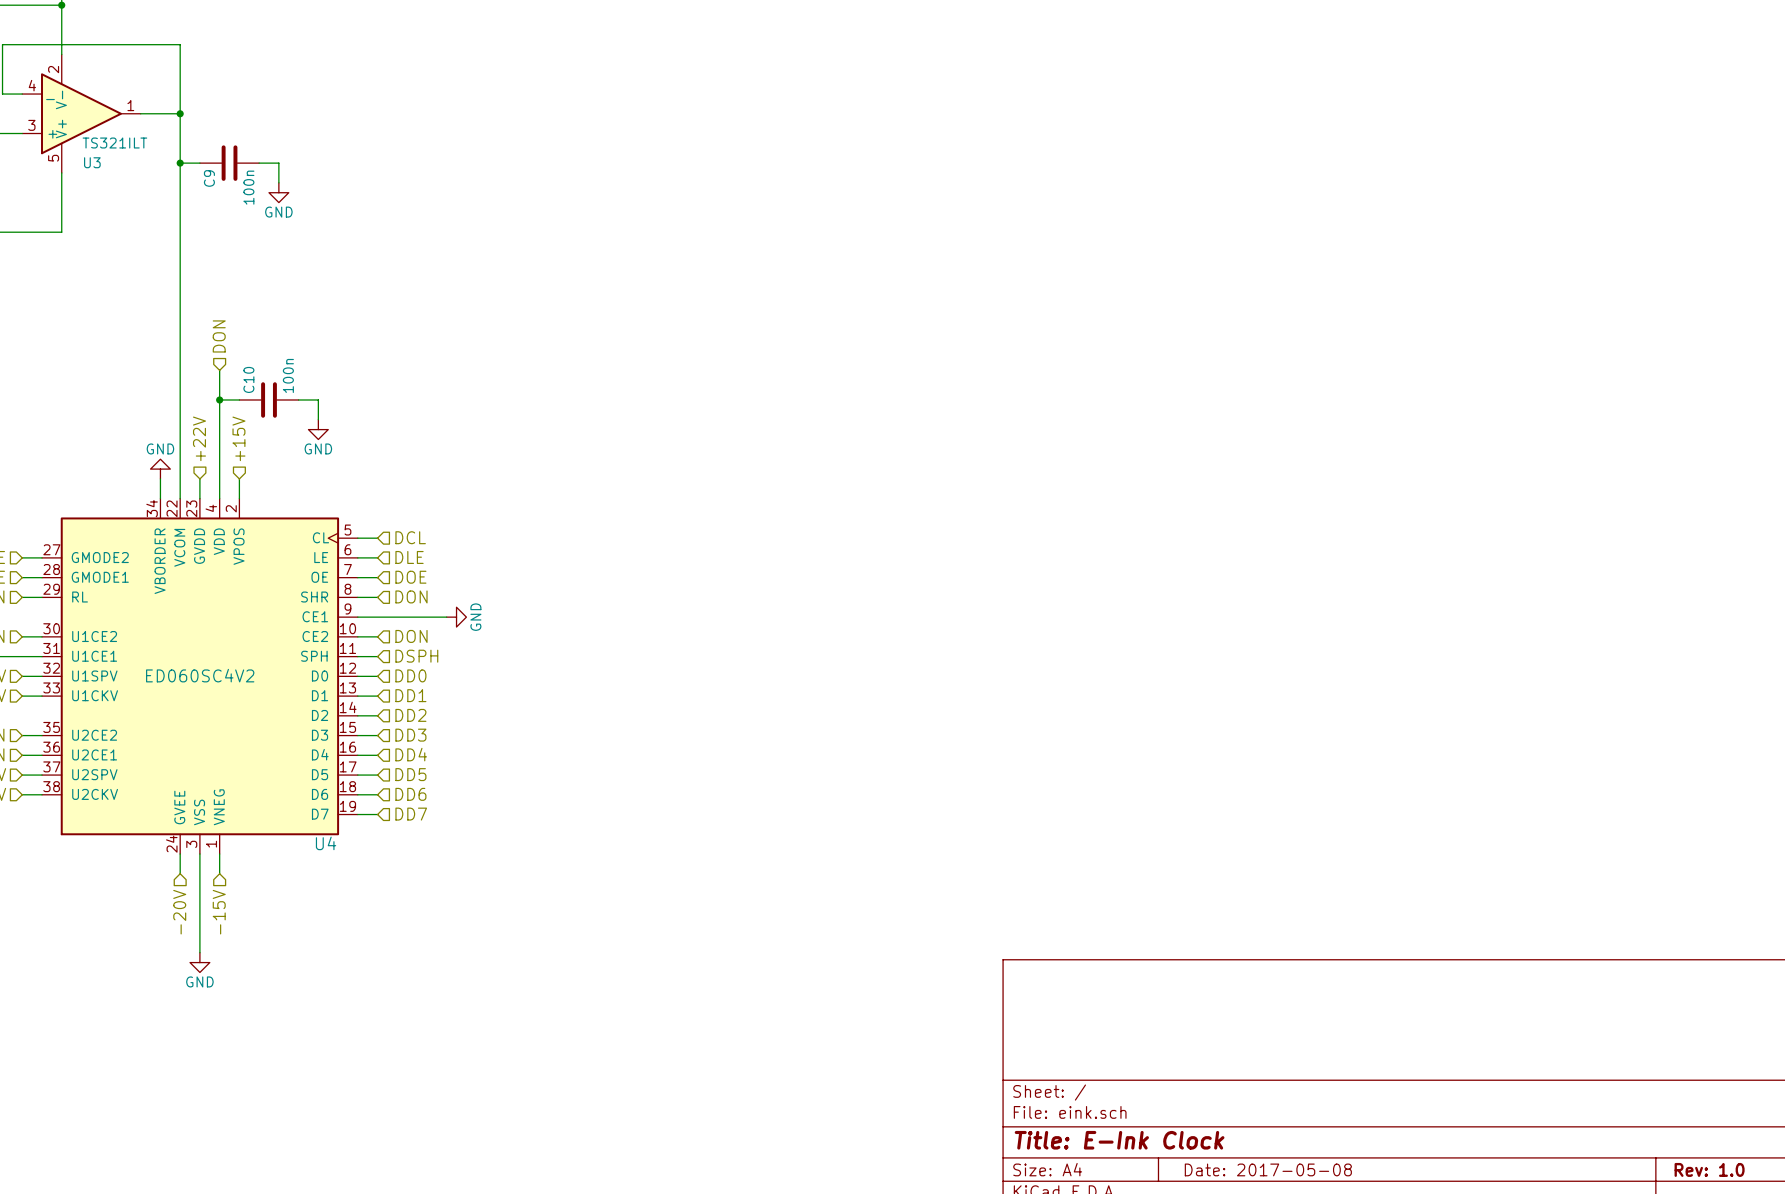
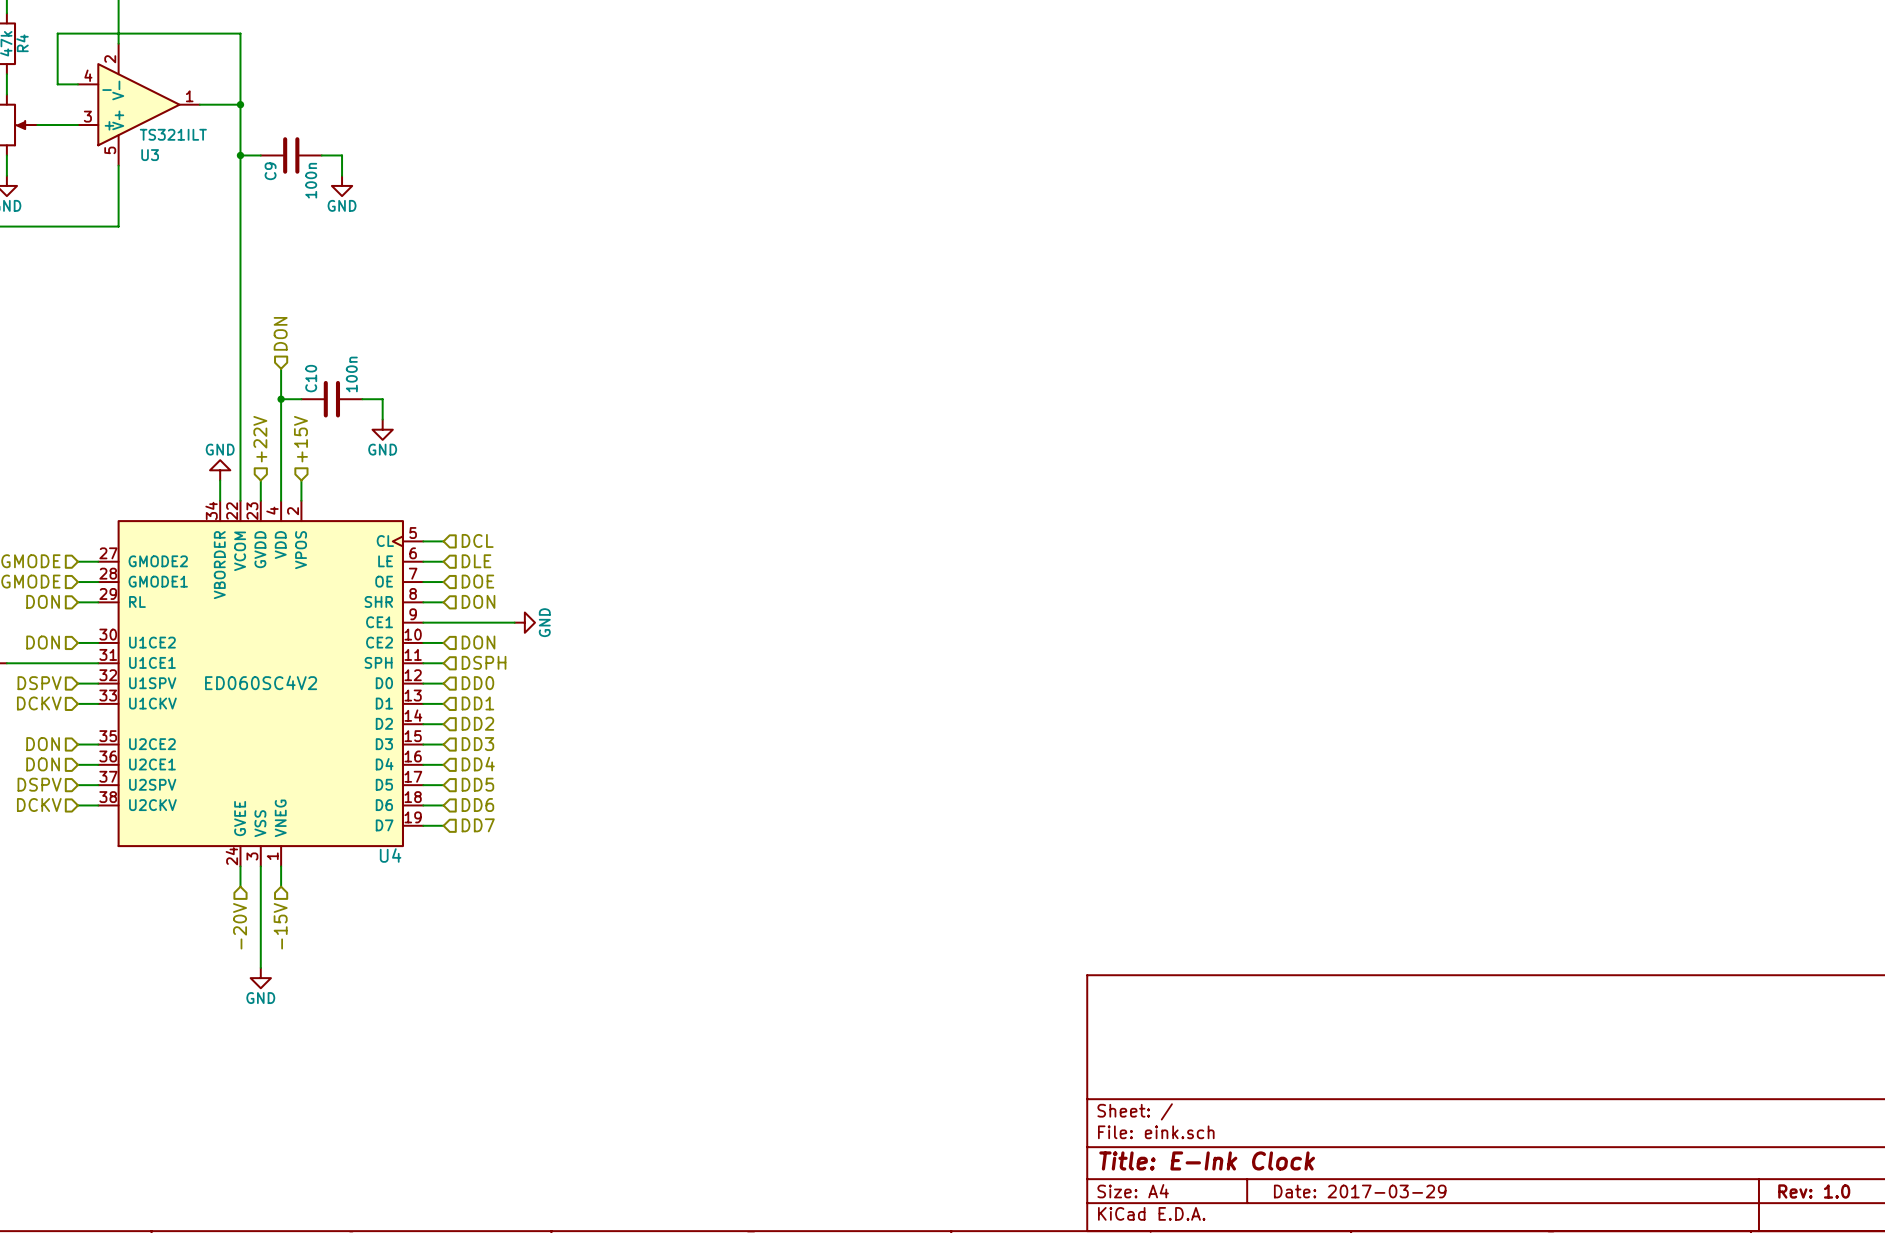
title block: Date: 2017-05-08 (1268, 1169) -> Date: 2017-03-29 (1360, 1191)

